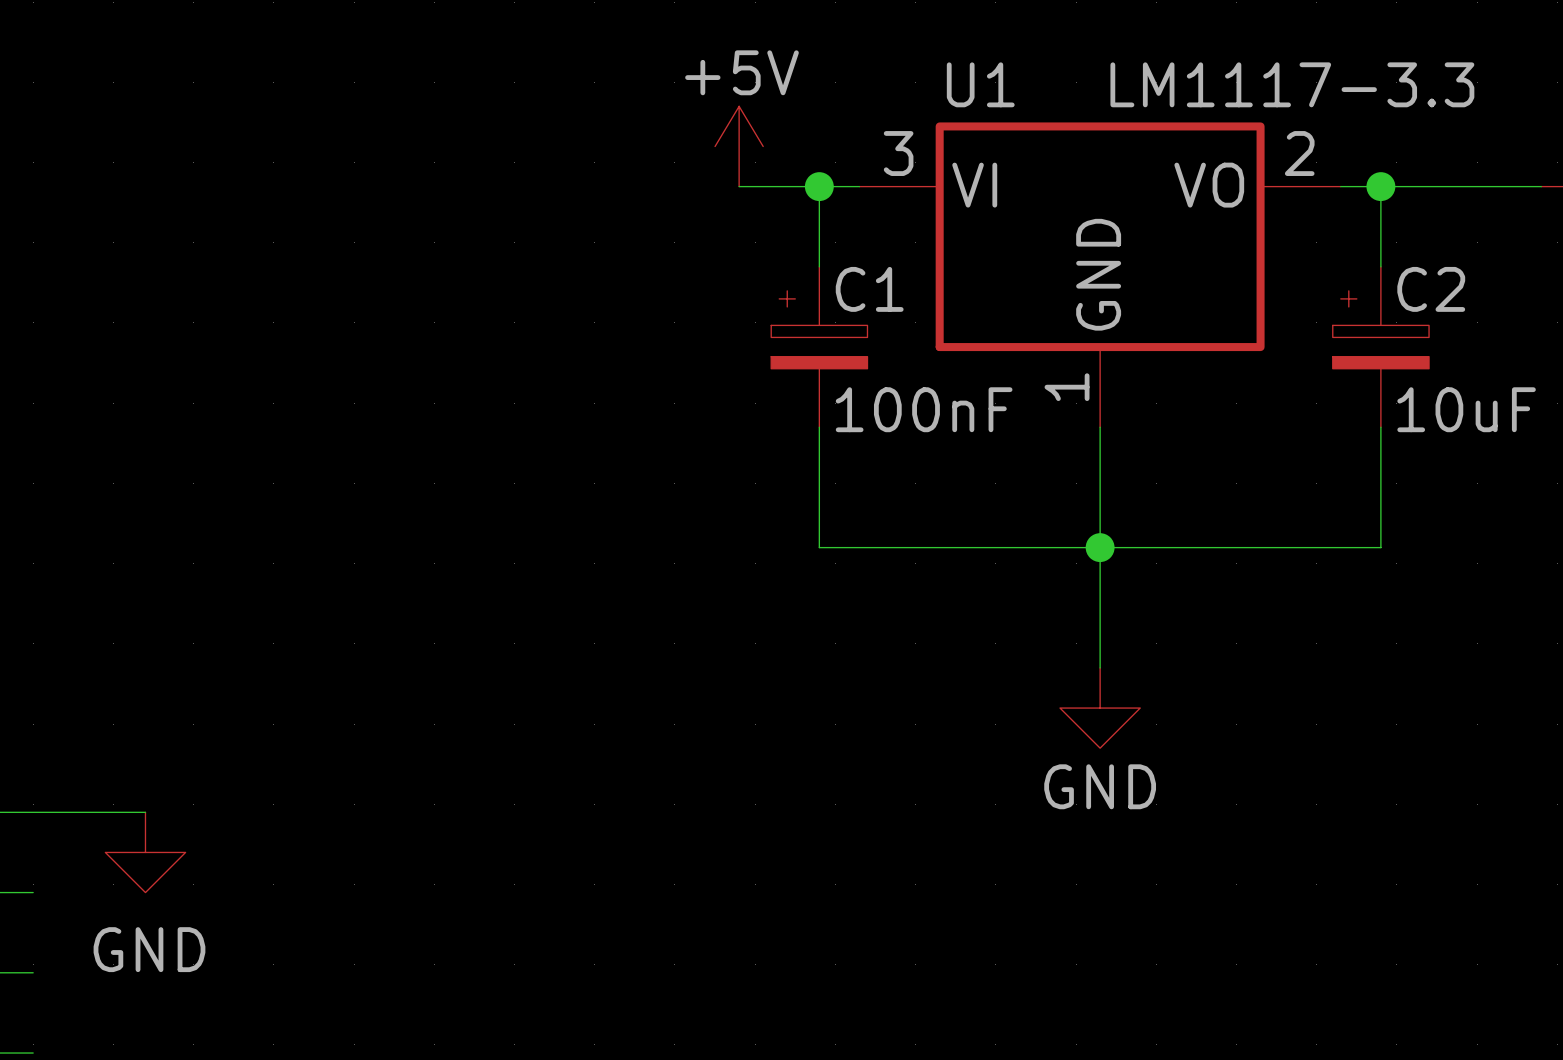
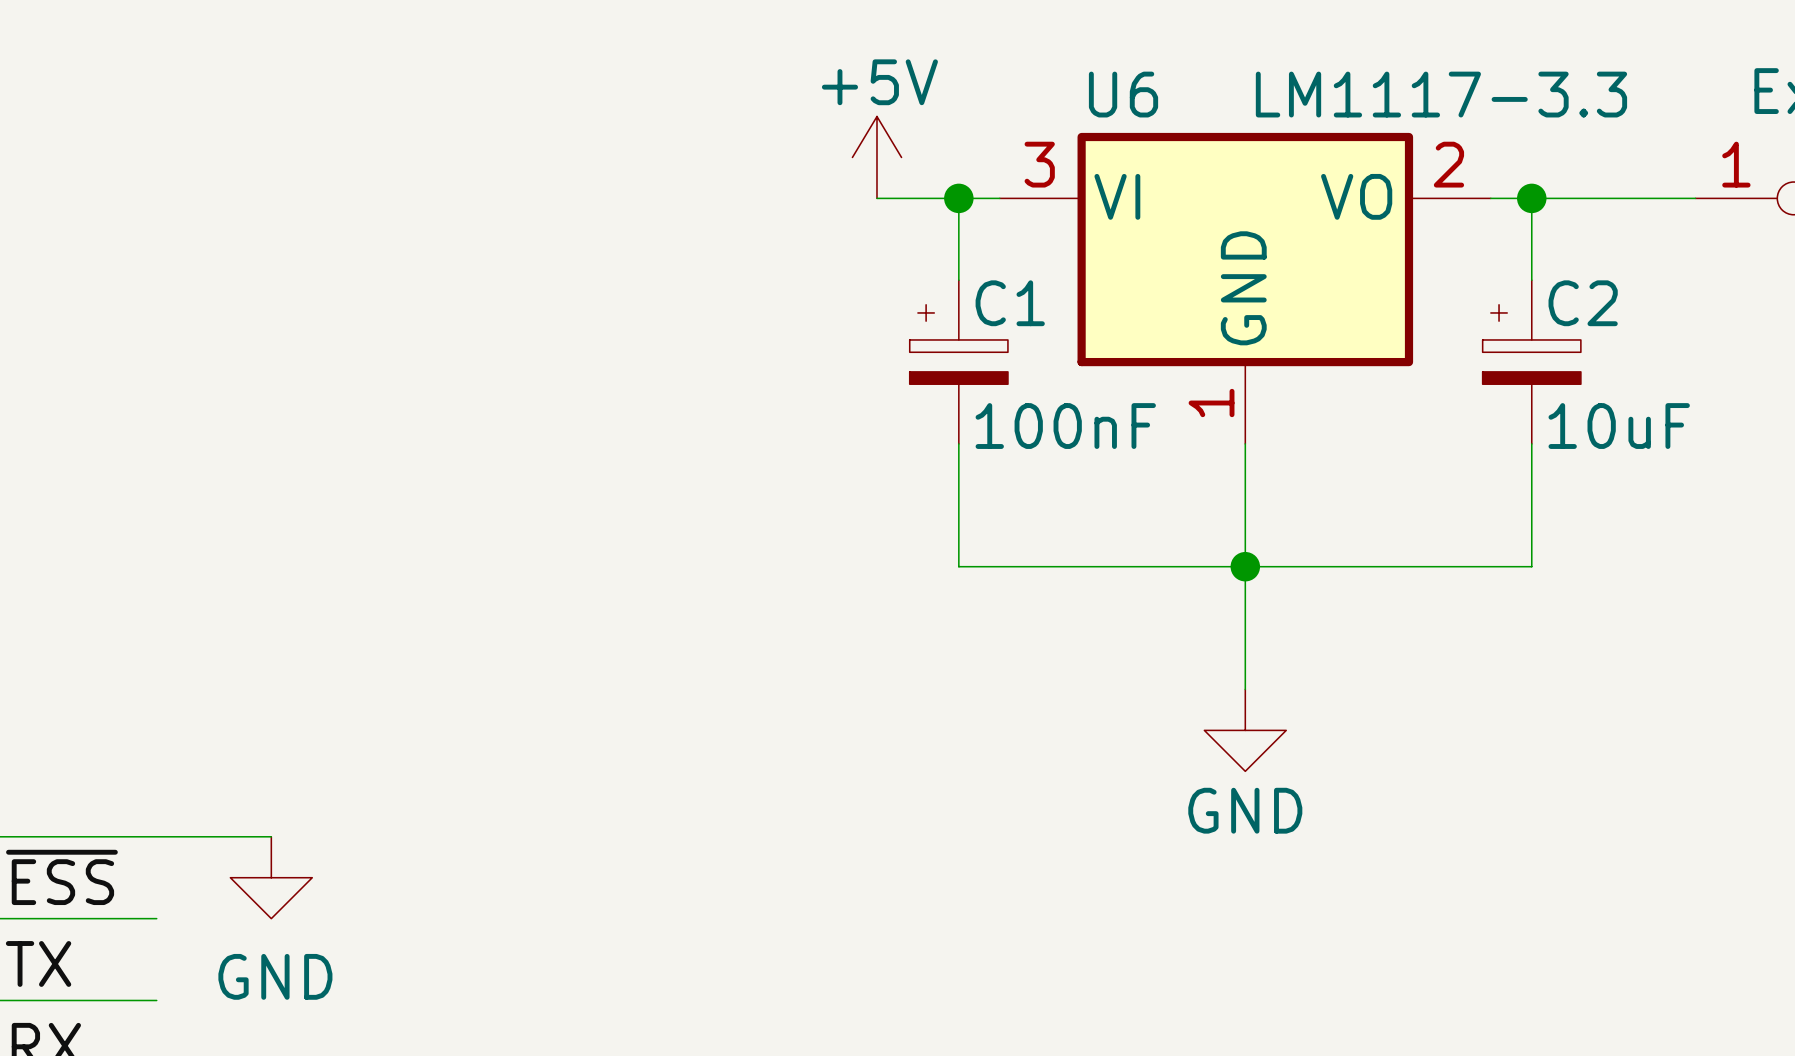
U1 name: U1 (980, 84) -> U6 (1123, 94)

